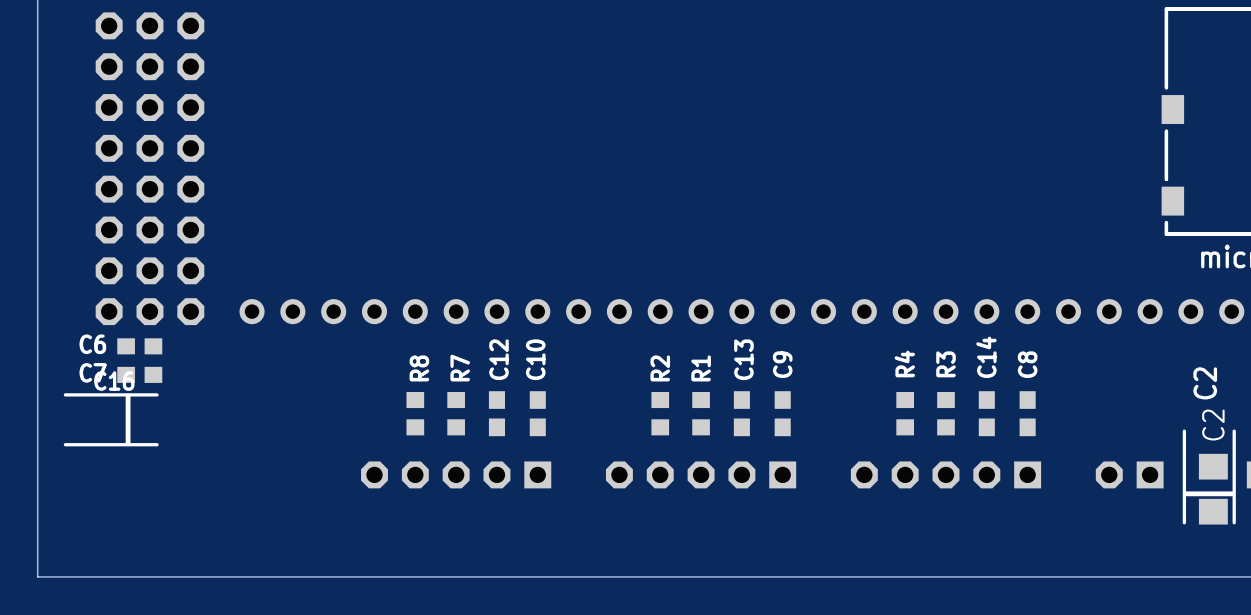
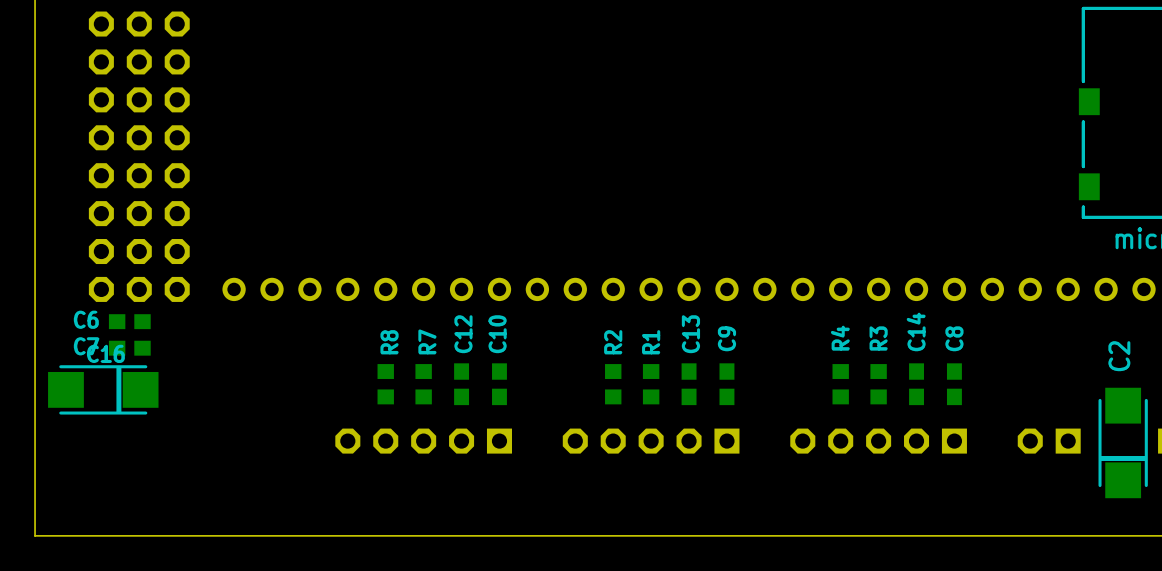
part: none -> (103, 389)
C2 footprint: [1198, 453, 1228, 525] -> [1099, 387, 1148, 499]

